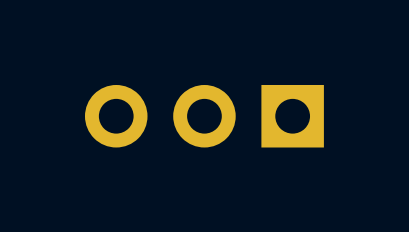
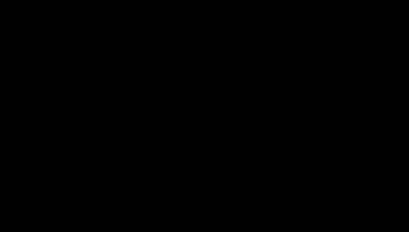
part: (204, 116) -> none

